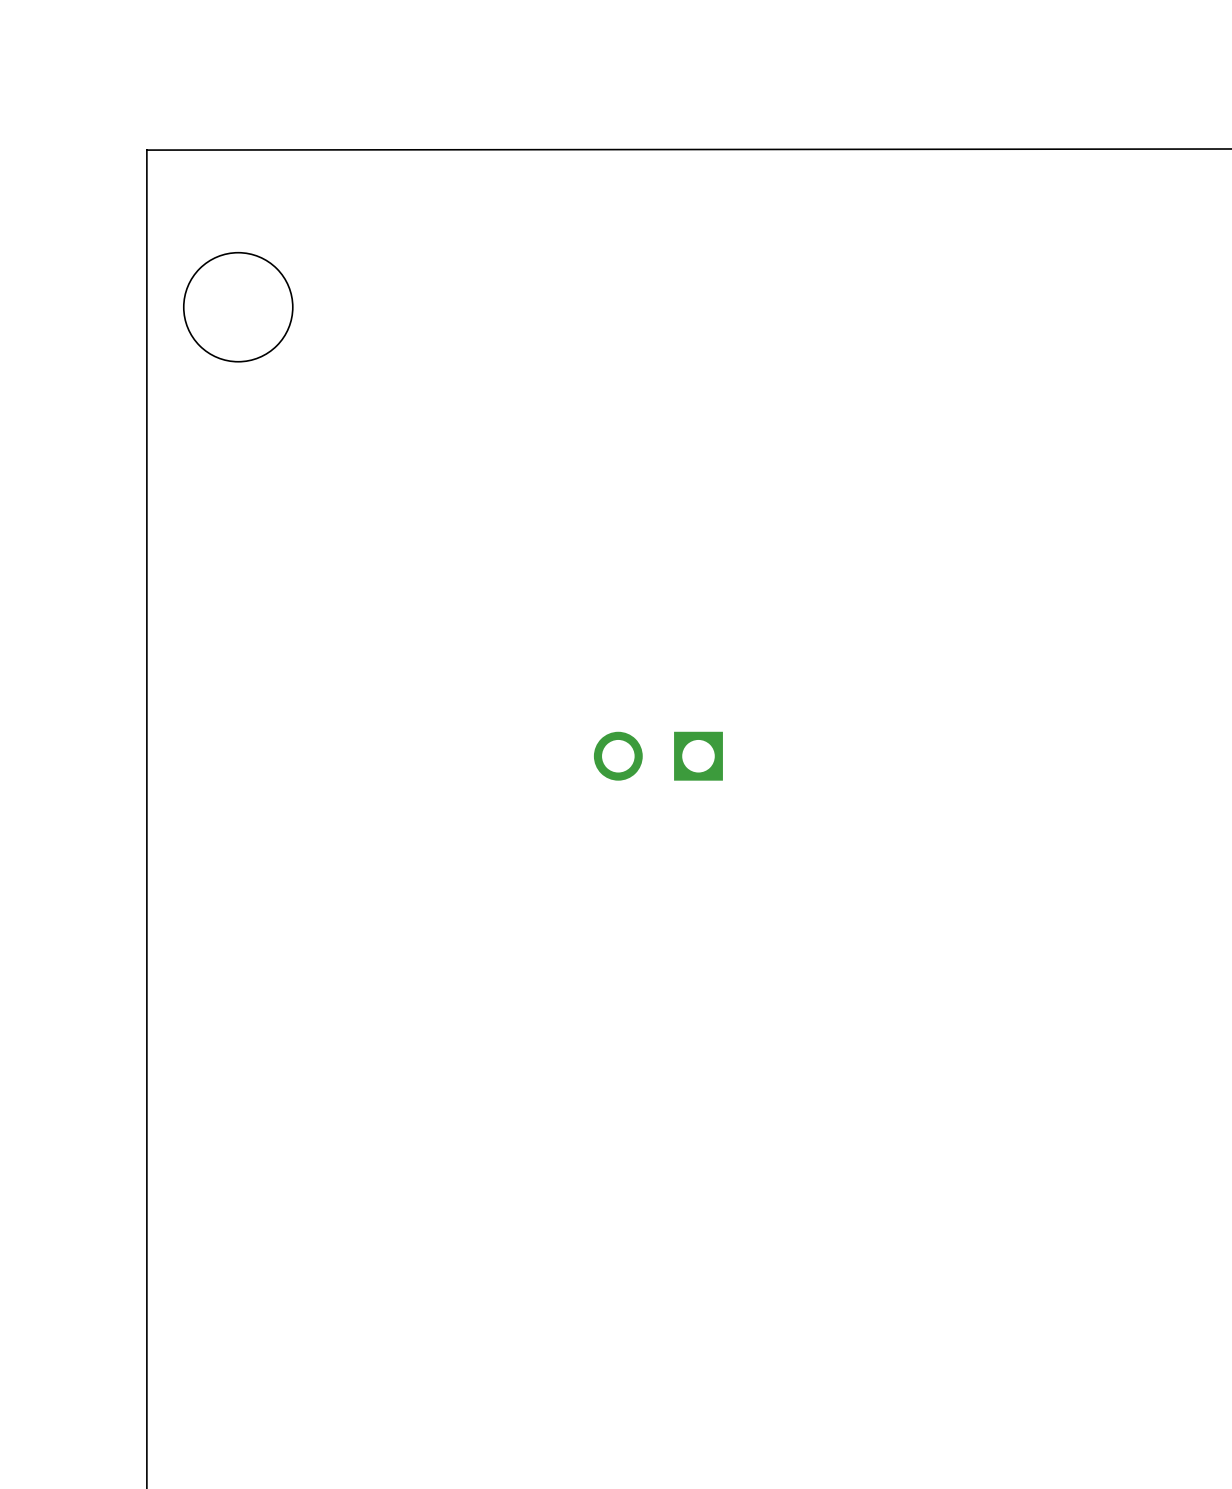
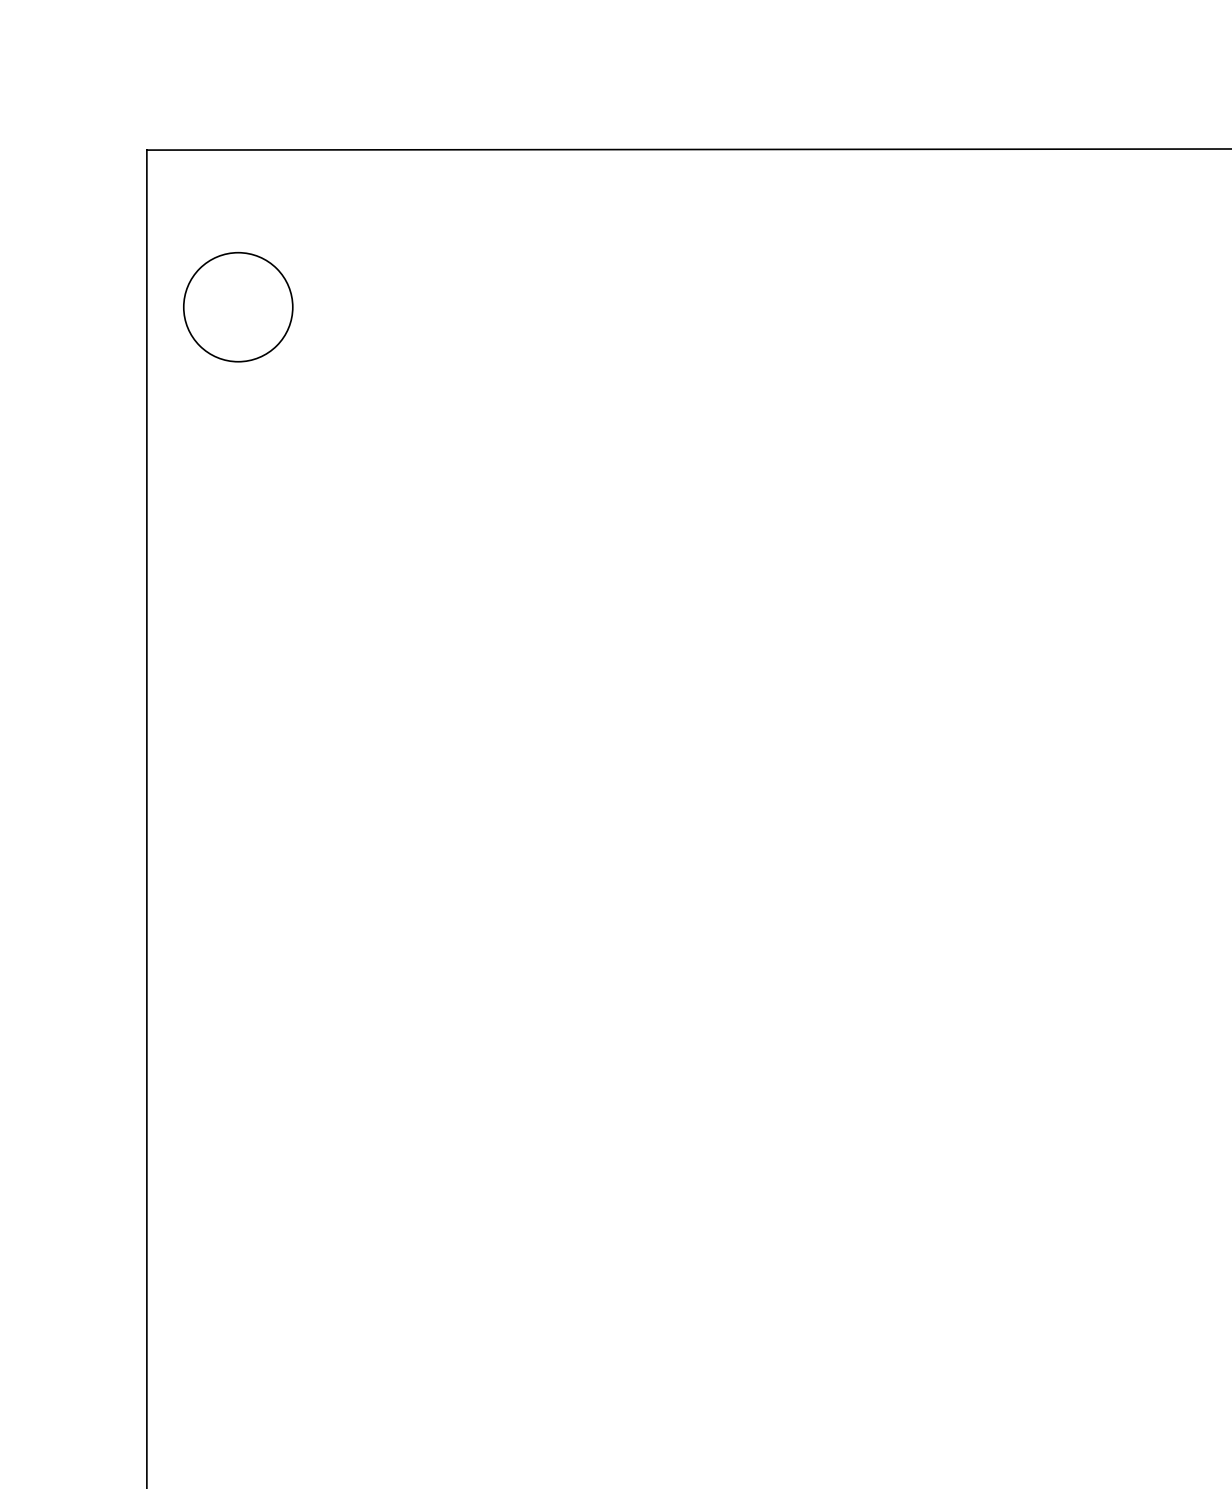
part: (658, 756) -> none

